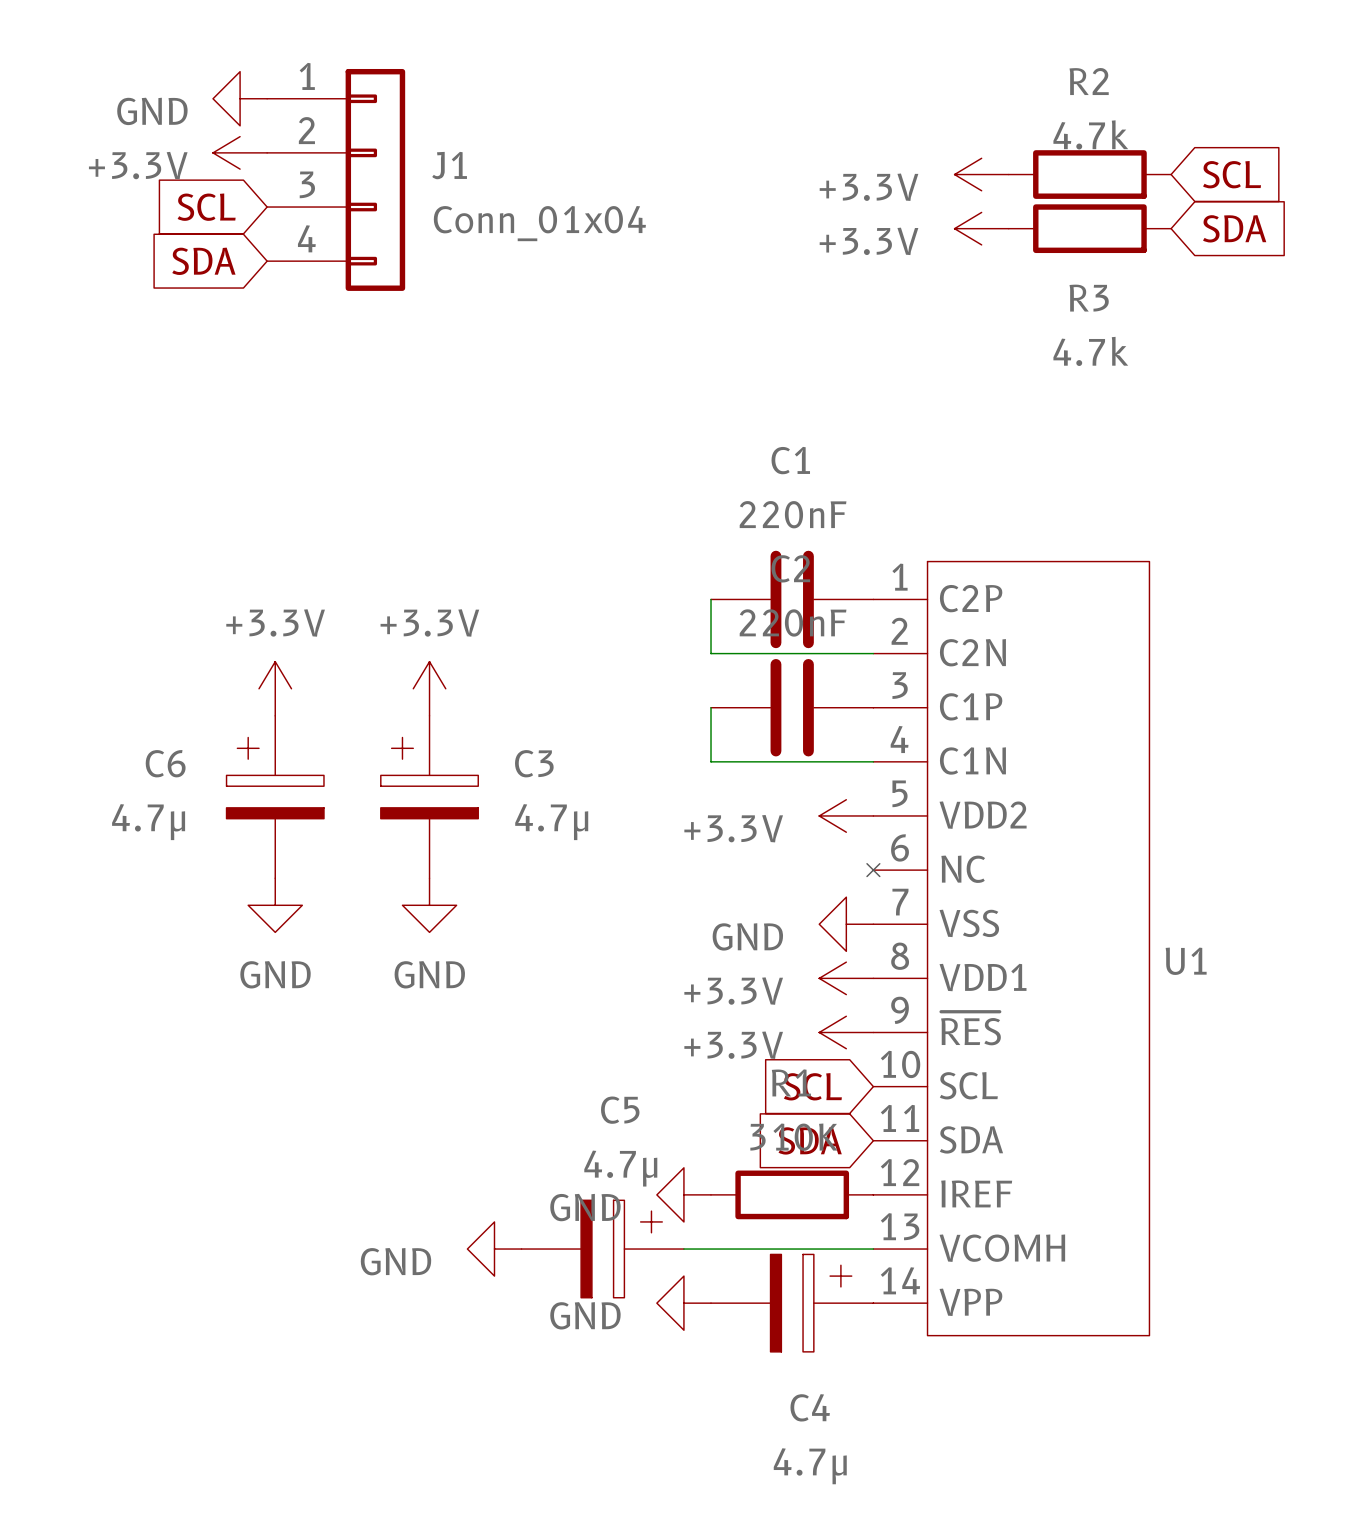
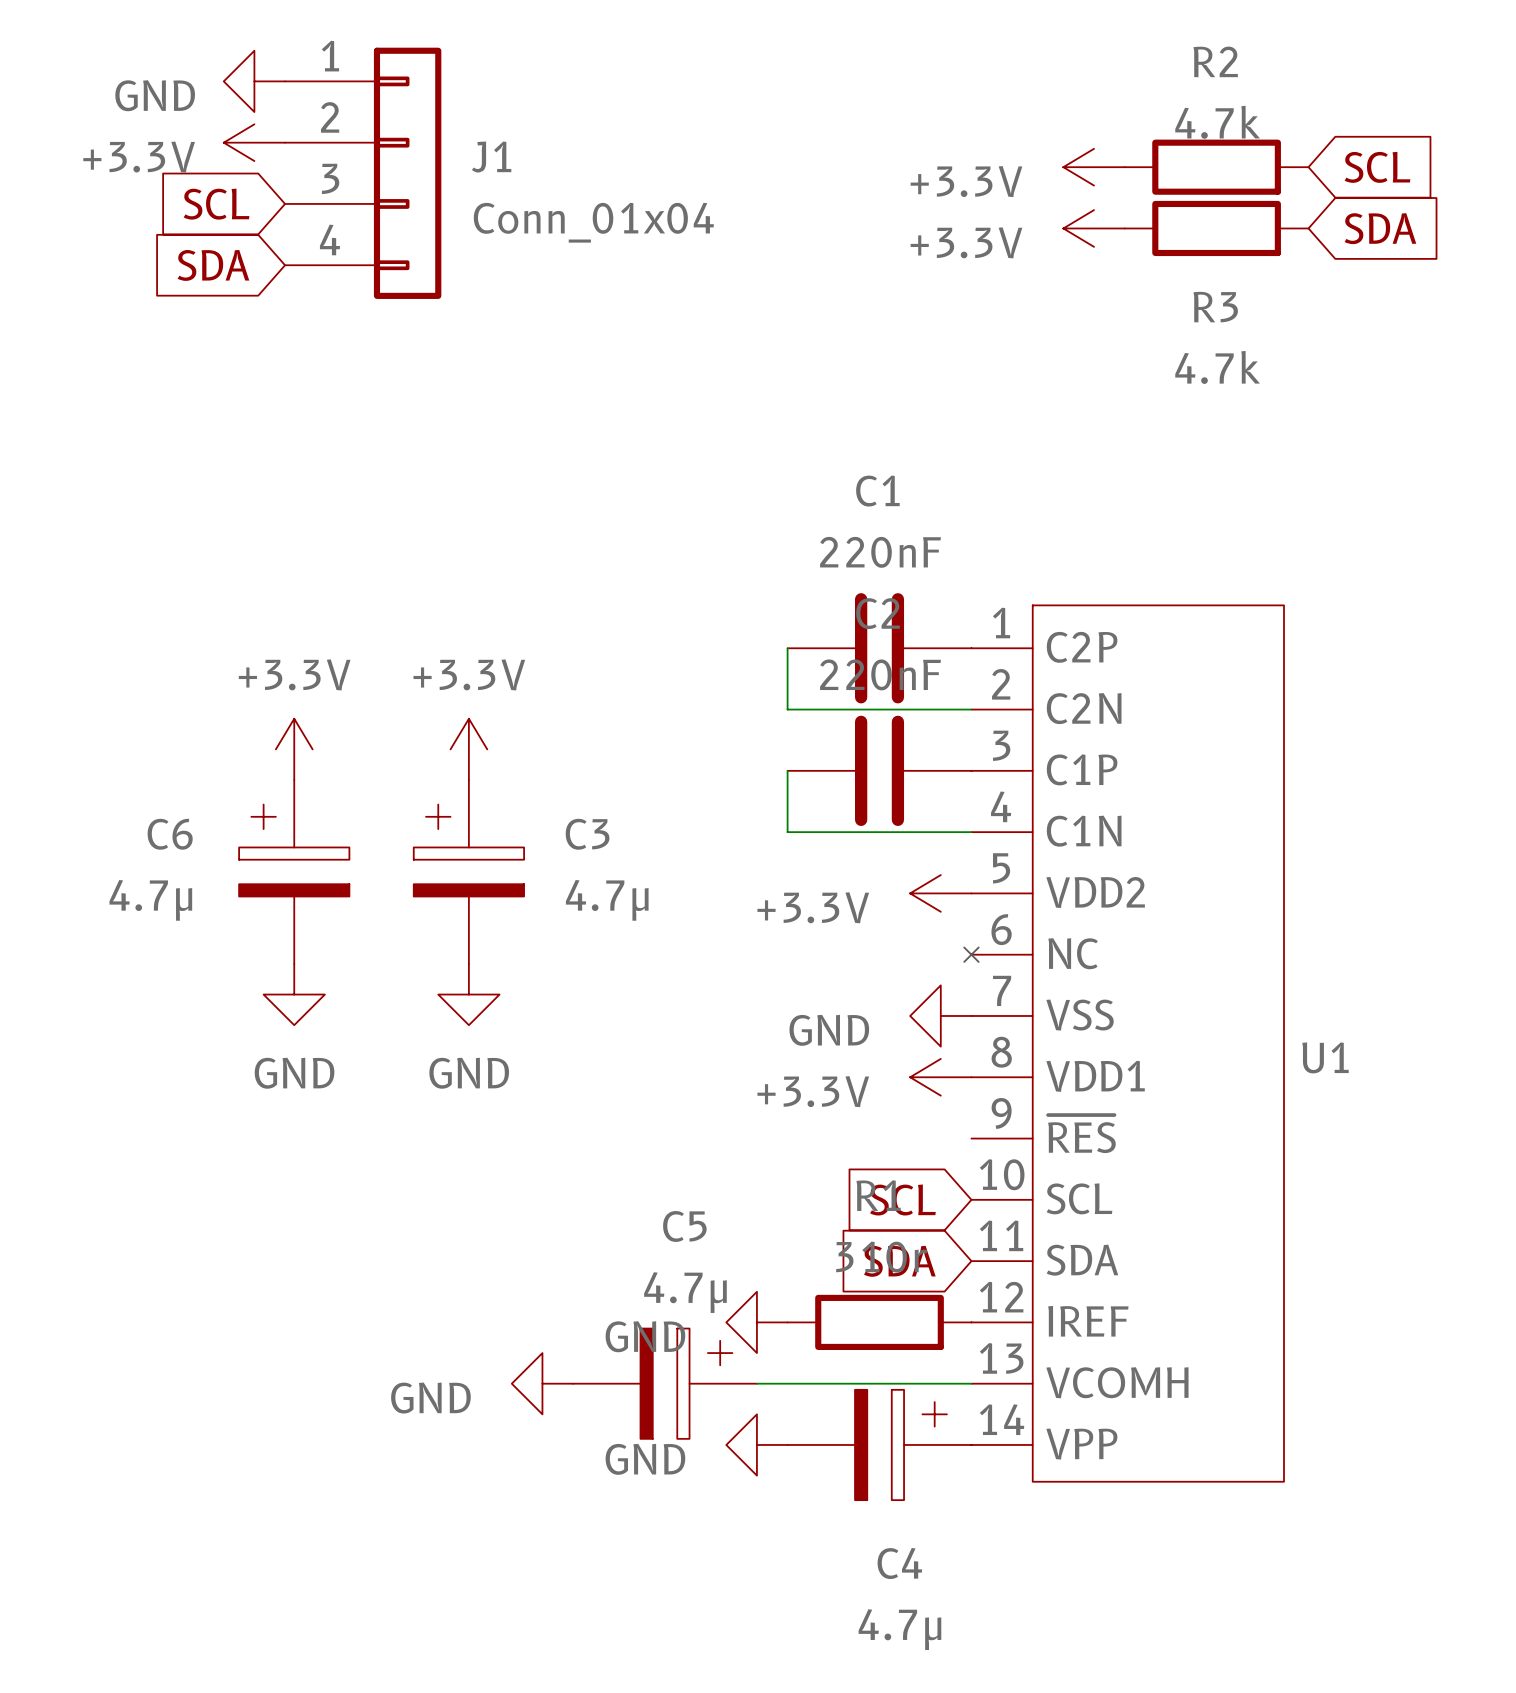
power symbol: +3.3V (846, 1032) -> none
R1 value: 310K (793, 1137) -> 310r (881, 1257)

